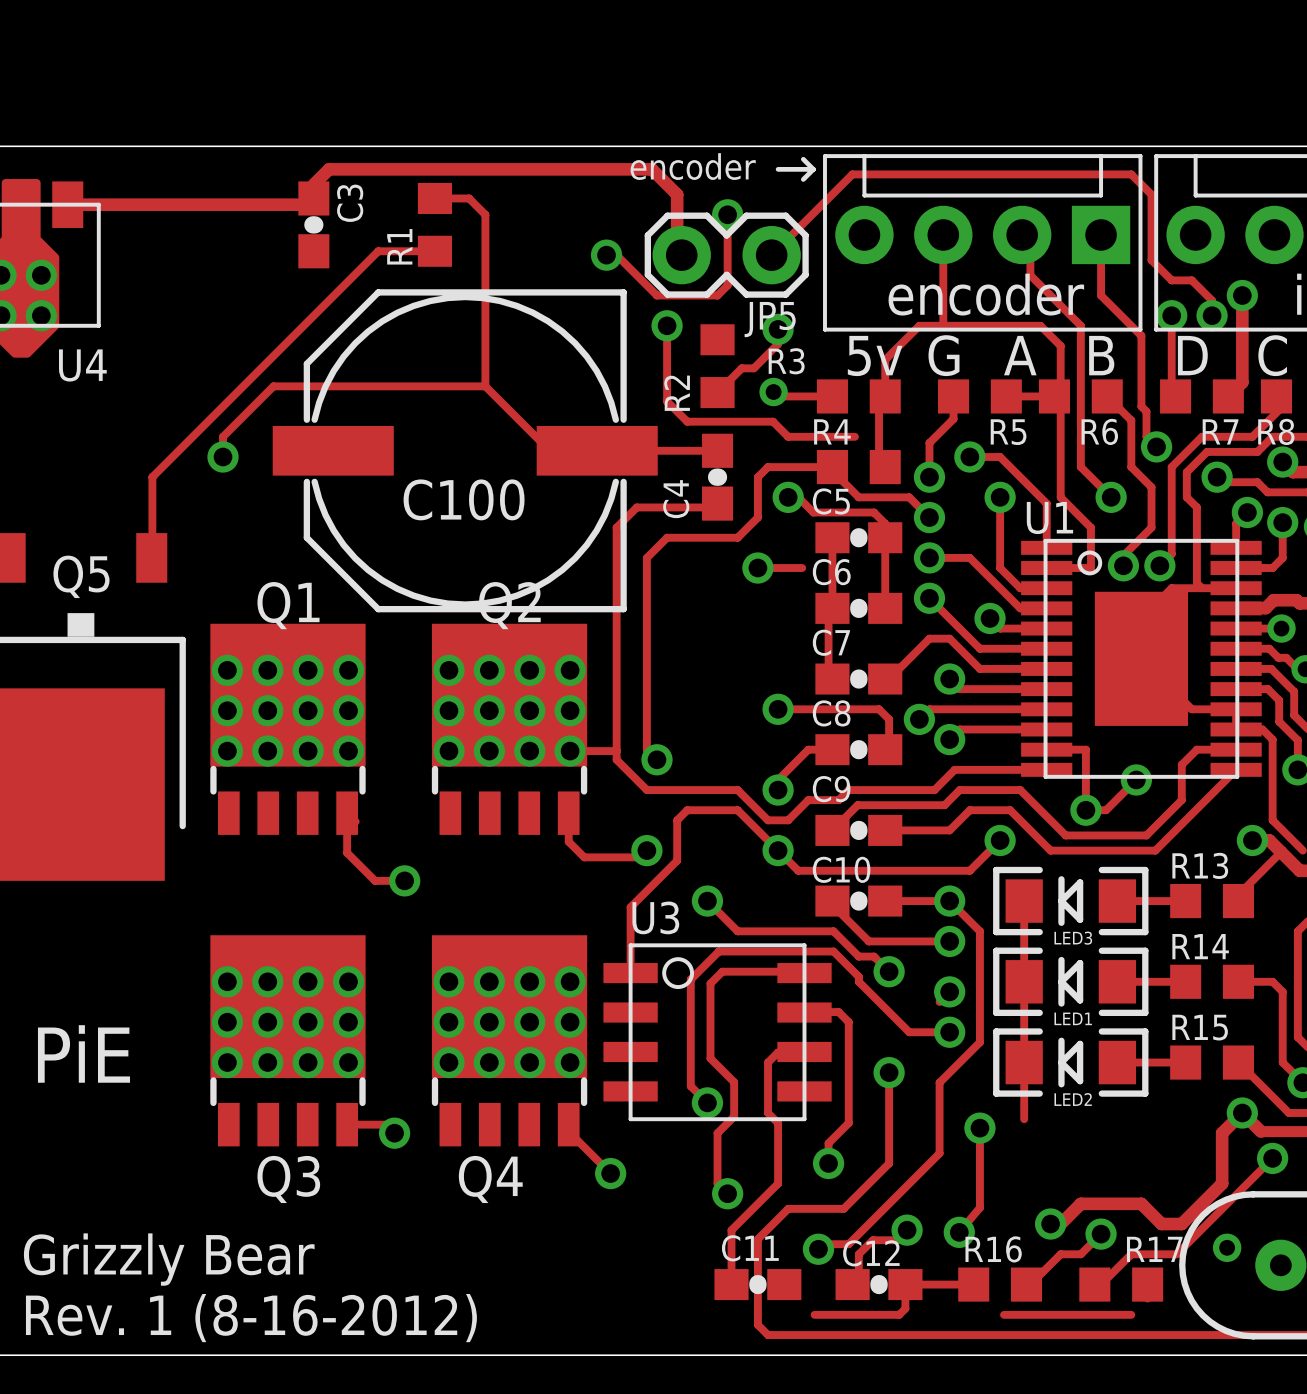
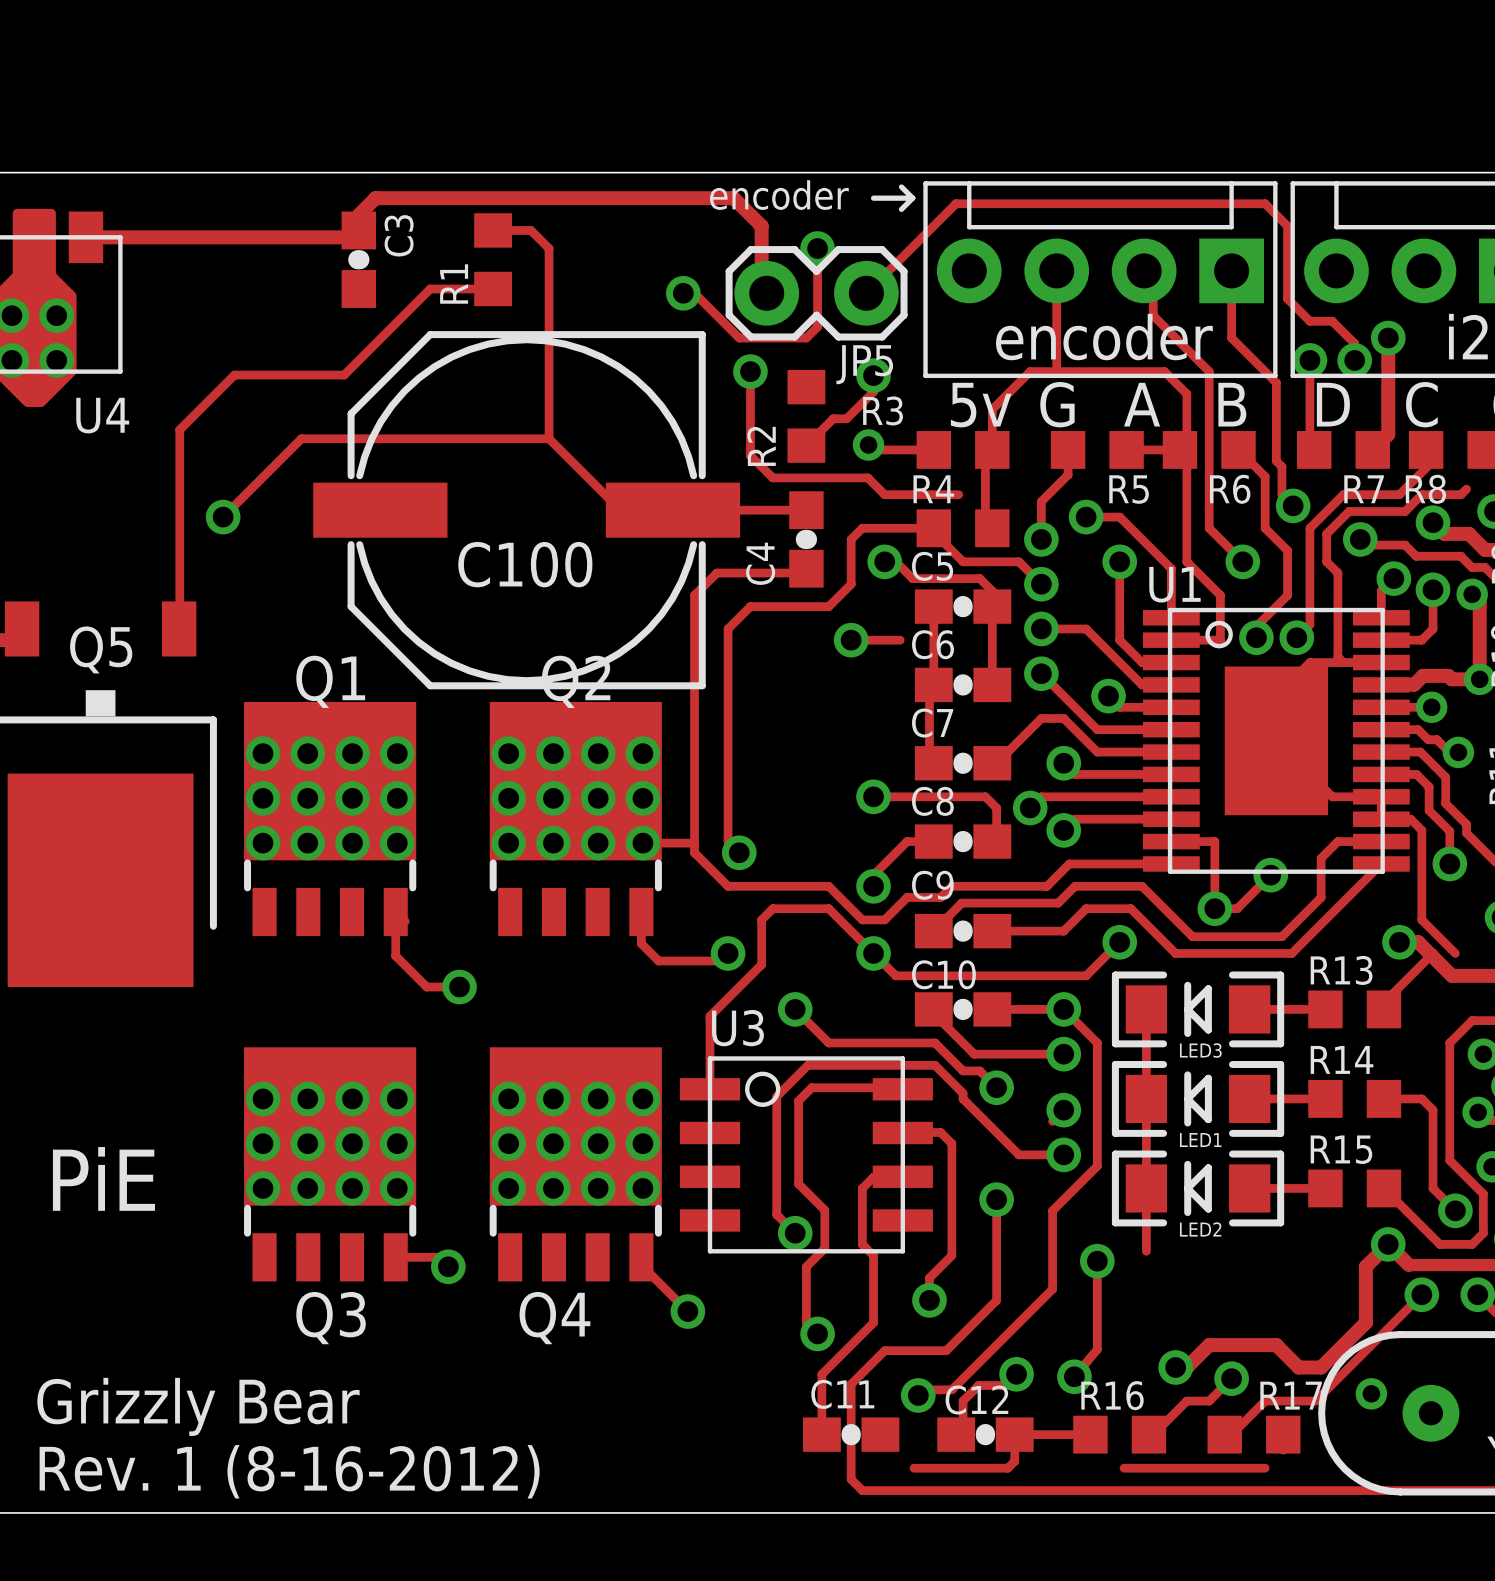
track: (300, 328) (152, 477) -> (344, 375) (234, 375) (179, 429) (179, 539)
track: (273, 386) (223, 436) (223, 457) -> (314, 438) (301, 438) (223, 517)
via position: (223, 457) -> (223, 517)

